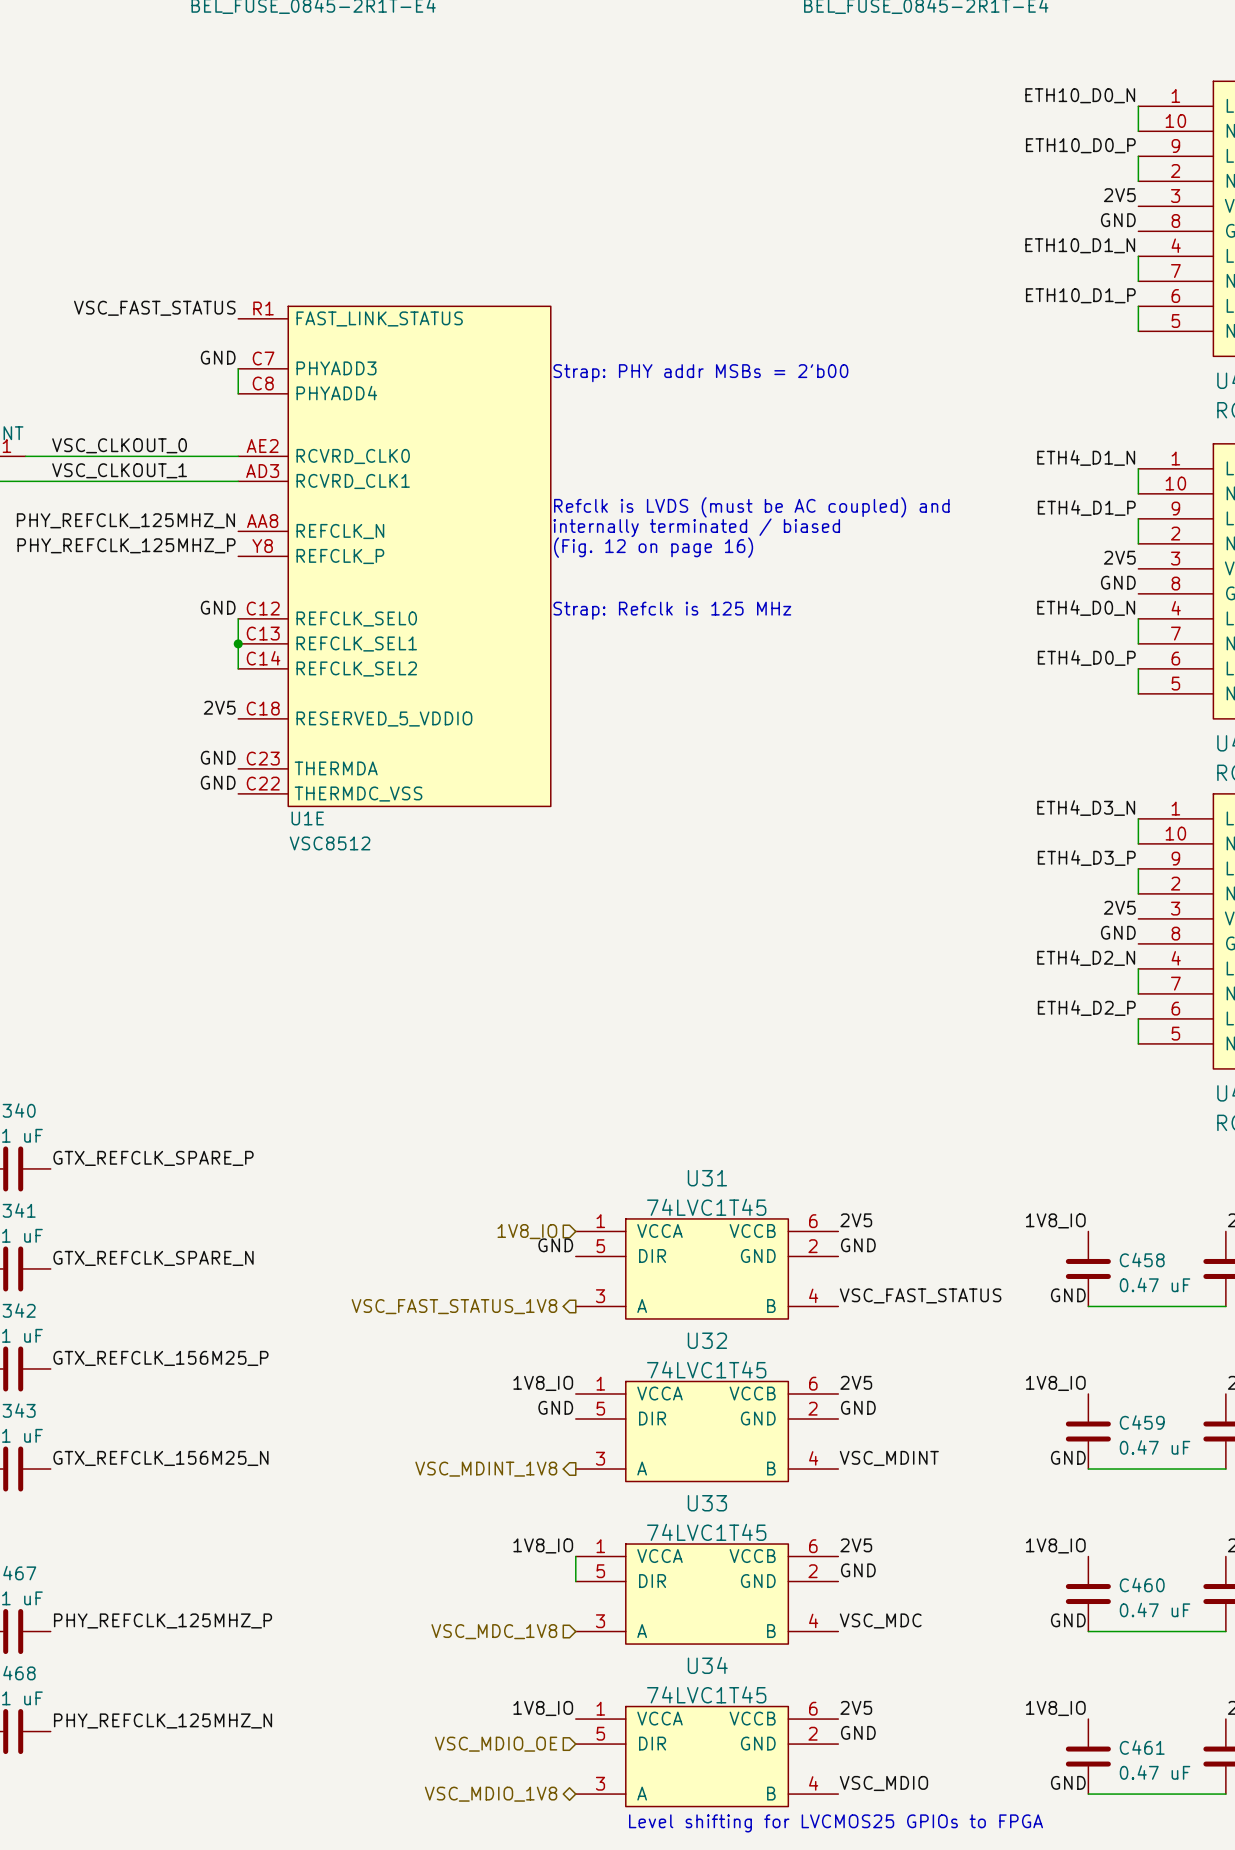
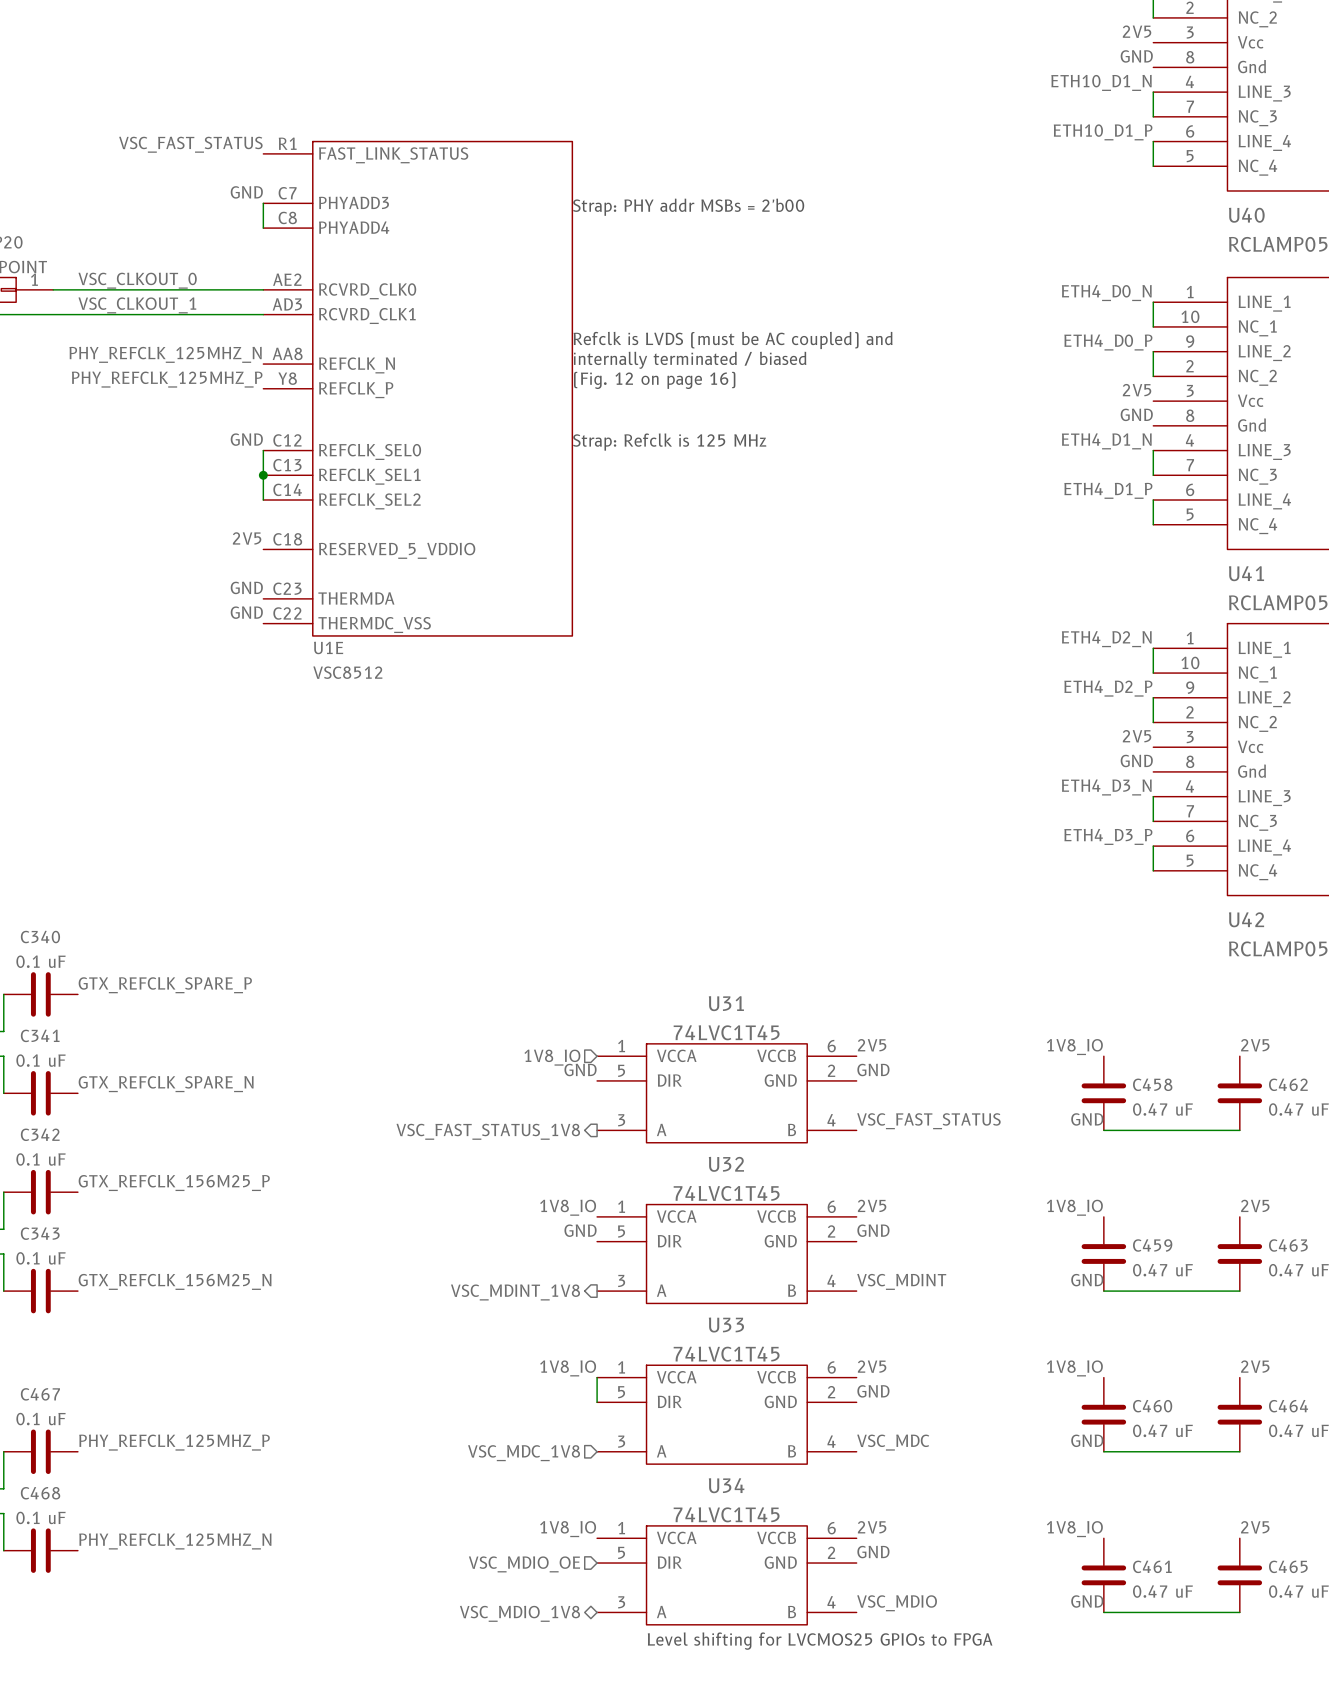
label: ETH4_D1_N (1086, 457) -> ETH4_D0_N (1106, 293)
label: ETH4_D1_P (1086, 508) -> ETH4_D0_P (1108, 342)
label: ETH4_D0_N (1086, 608) -> ETH4_D1_N (1106, 441)
label: ETH4_D0_P (1086, 658) -> ETH4_D1_P (1108, 490)
label: ETH4_D3_N (1086, 808) -> ETH4_D2_N (1106, 639)
label: ETH4_D3_P (1086, 858) -> ETH4_D2_P (1108, 688)
label: ETH4_D2_N (1086, 958) -> ETH4_D3_N (1106, 787)
label: ETH4_D2_P (1086, 1008) -> ETH4_D3_P (1108, 836)

